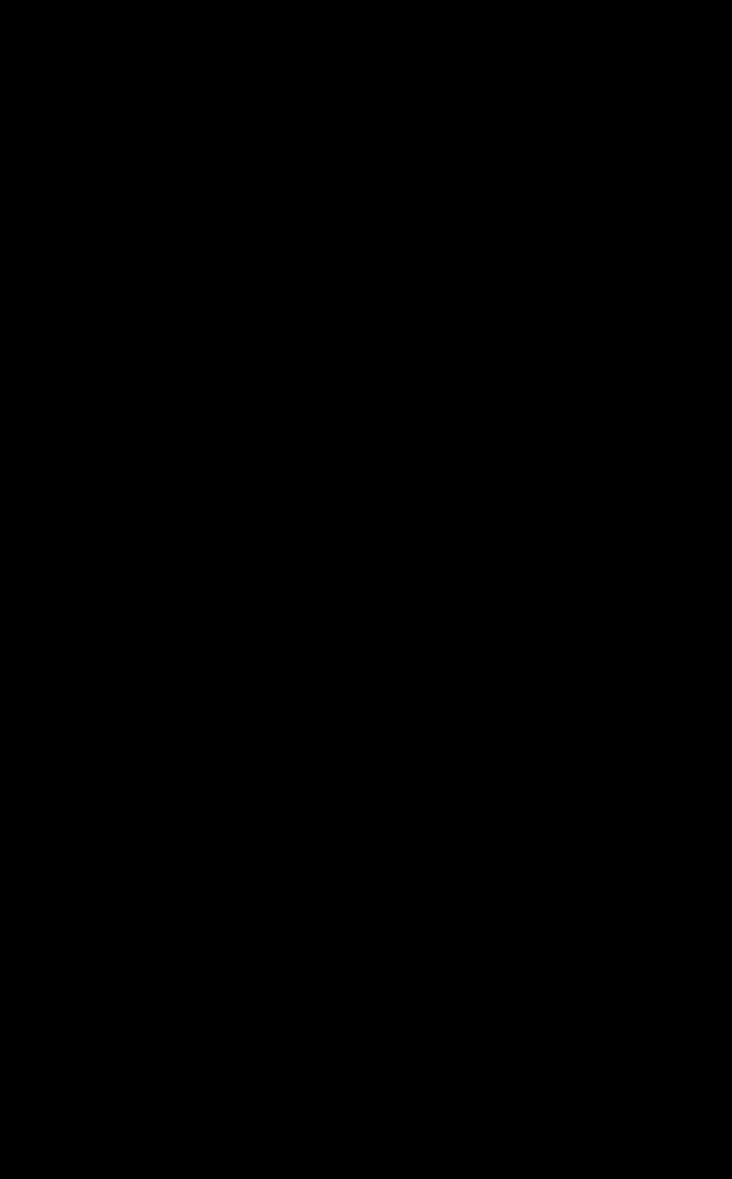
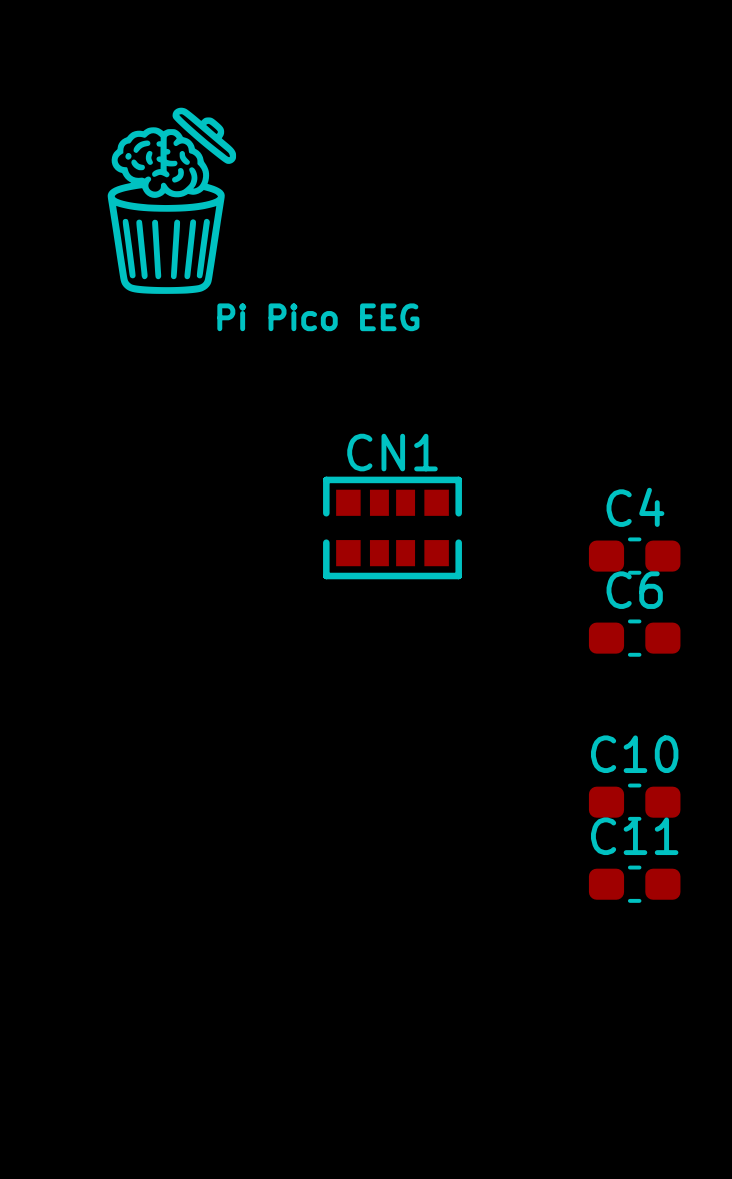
drawing: none -> [107, 107, 237, 294]
text: none -> Pi Pico EEG (318, 317)
CN1: none -> (392, 527)
C4: none -> (634, 556)
C6: none -> (634, 638)
C10: none -> (634, 802)
C11: none -> (634, 884)

